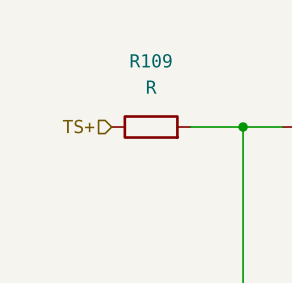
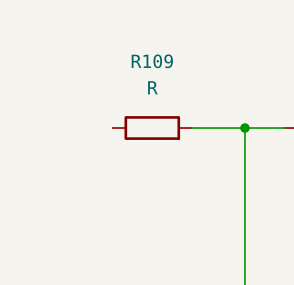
hierarchical label: TS+ (78, 126) -> none

